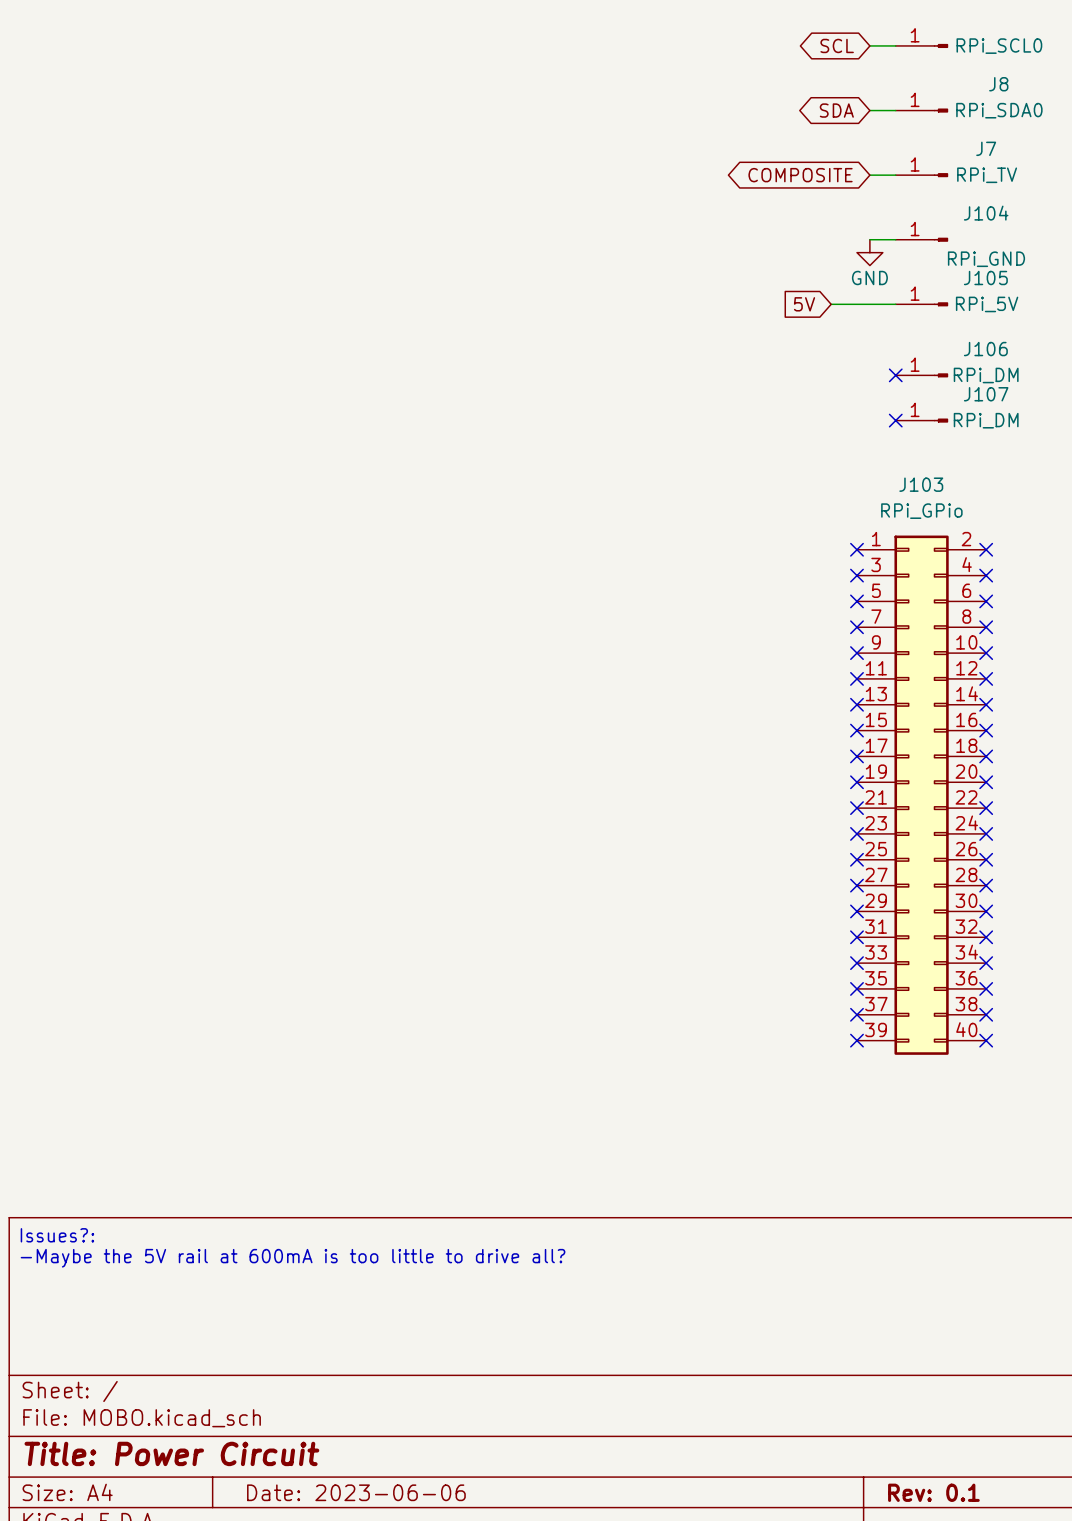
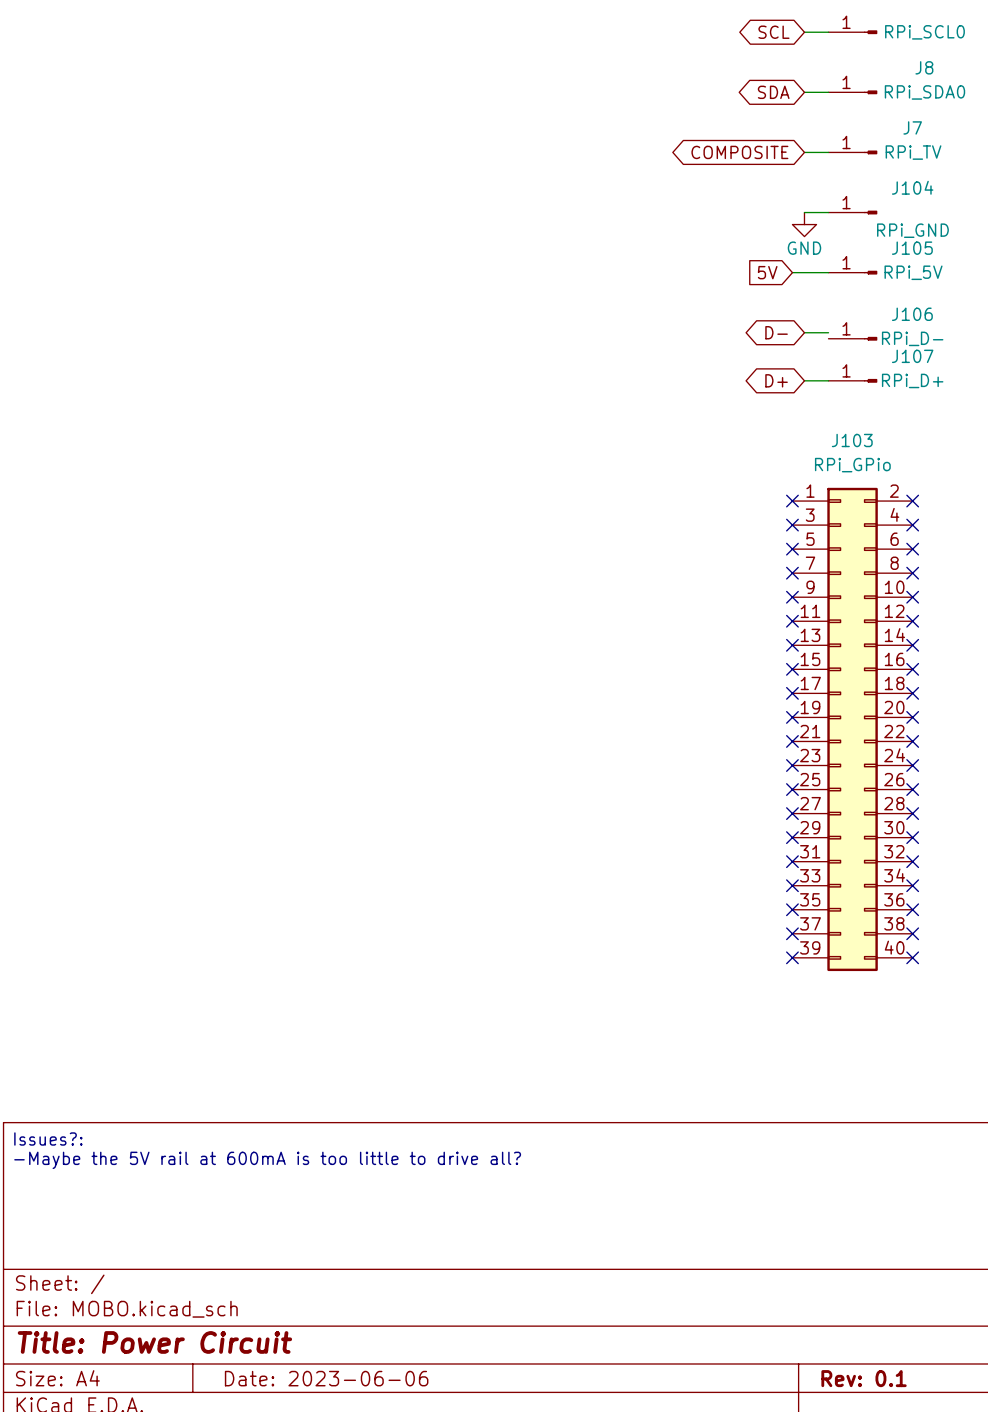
global label position: 5V (804, 304) -> 5V (767, 272)
wire: (831, 304) (856, 304) -> (804, 332) (828, 332)
global label: none -> D- (776, 332)
no-connect mark: (895, 375) -> none
J106 value: RPi_DM (986, 375) -> RPi_D- (912, 338)
global label: none -> D+ (776, 380)
wire: none -> (804, 380) (828, 380)
no-connect mark: (895, 420) -> none
J107 value: RPi_DM (986, 420) -> RPi_D+ (912, 380)

